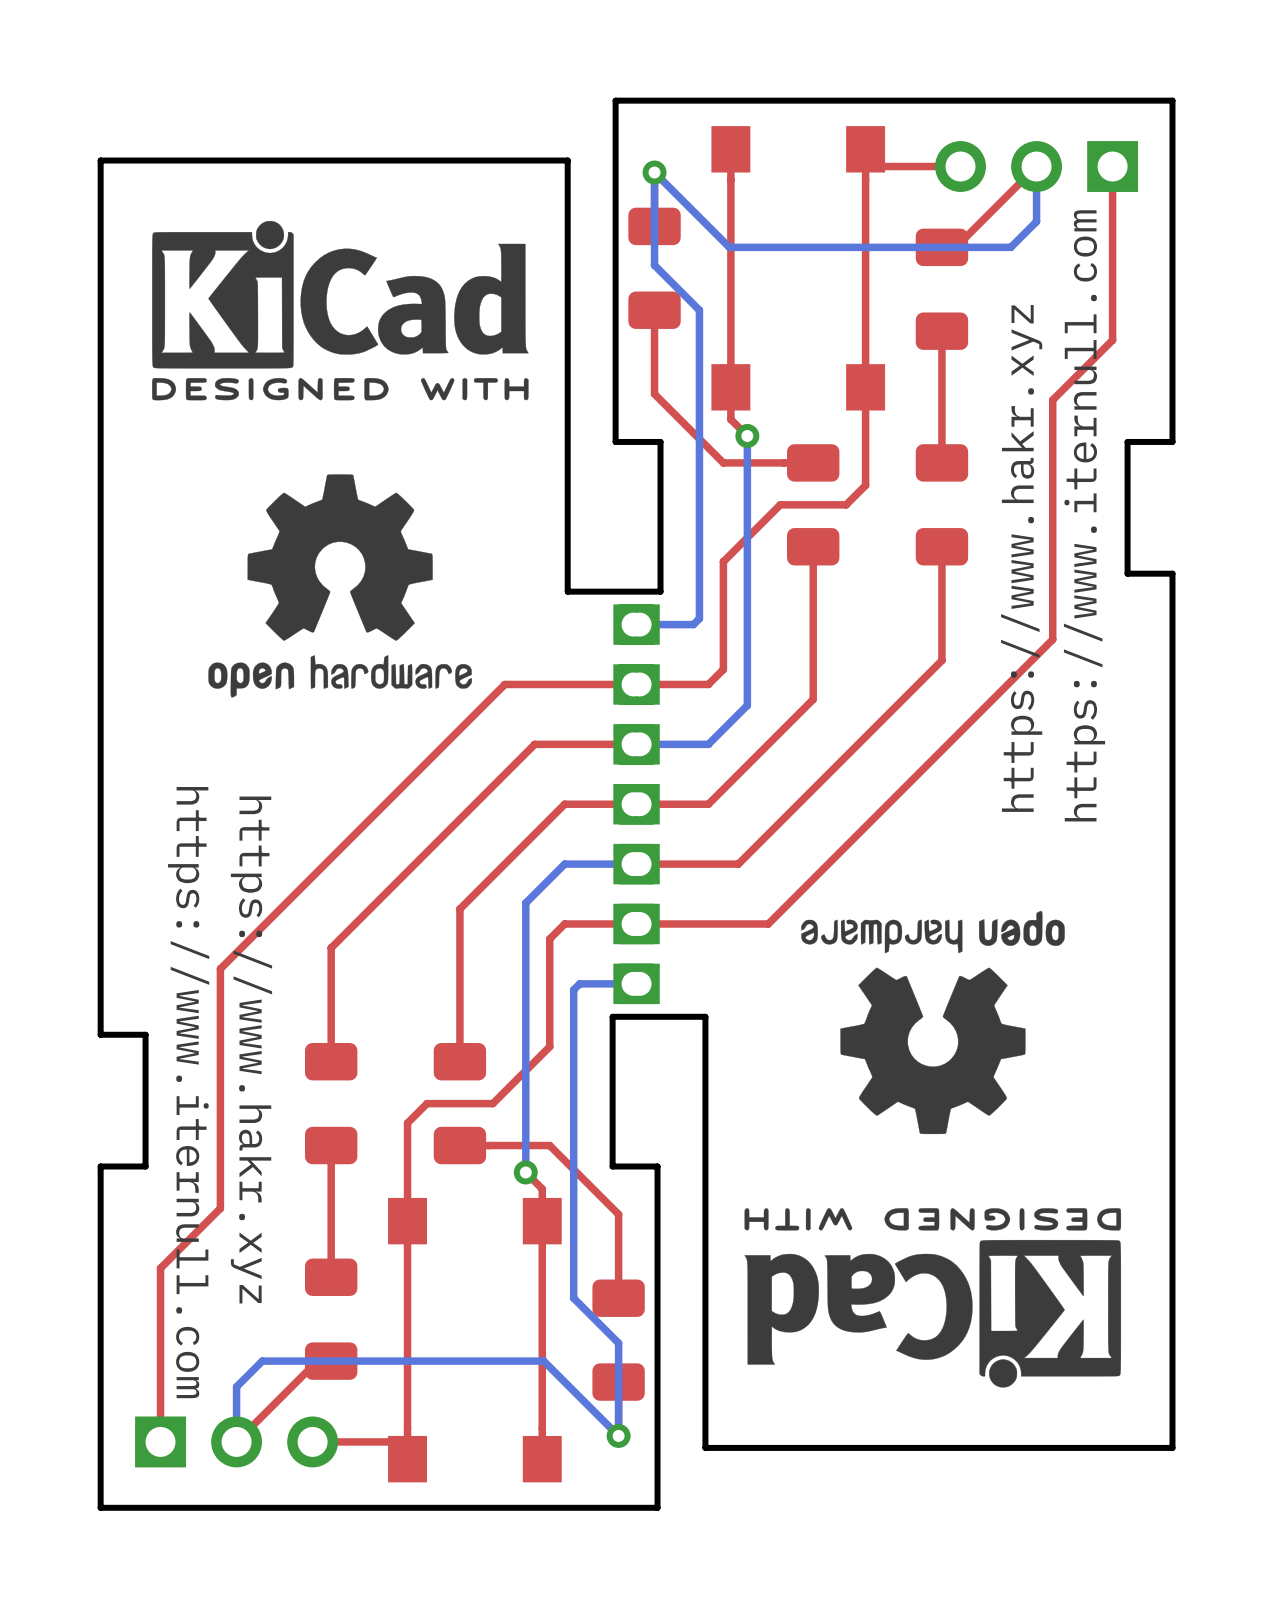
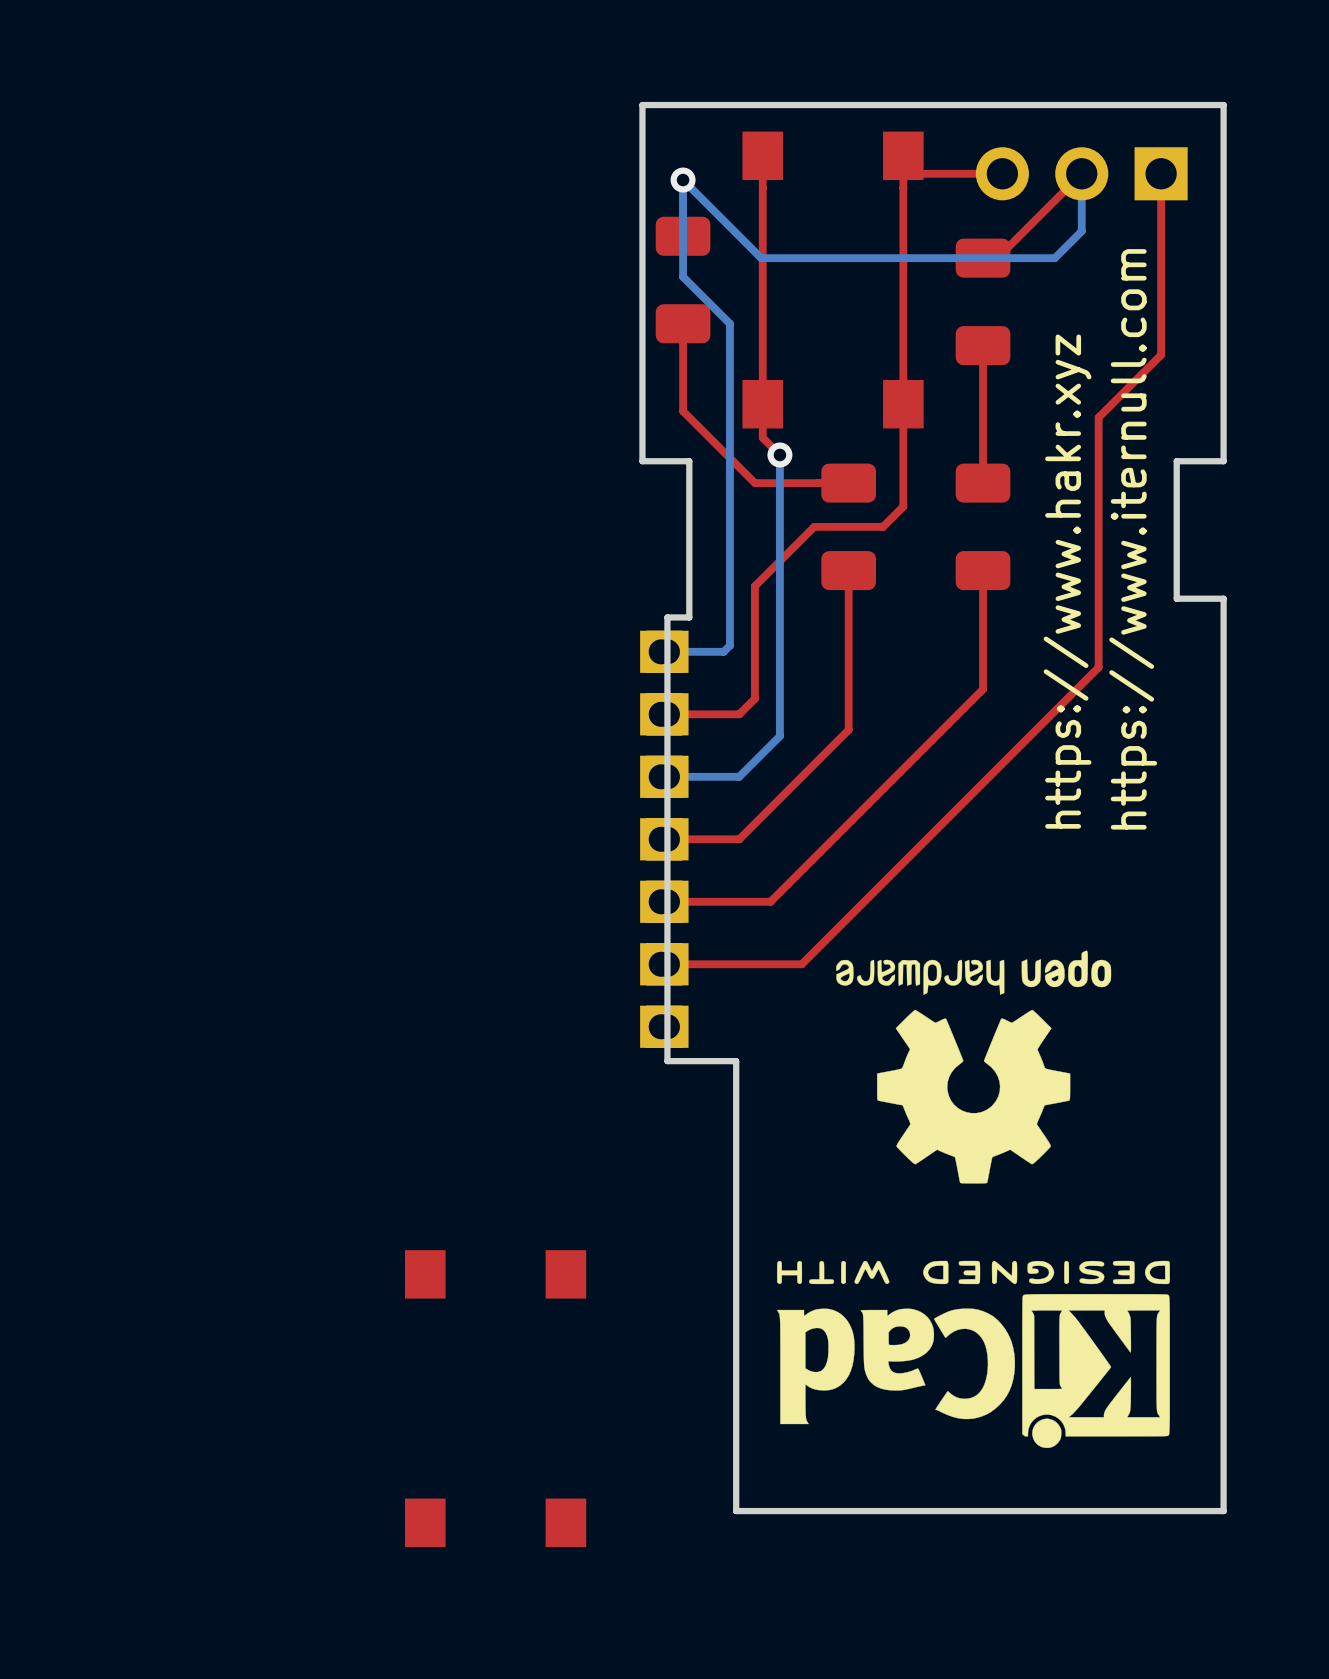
drawing: [152, 220, 529, 401] -> none
drawing: [208, 474, 472, 698] -> none
board edge: (639, 591) (567, 591) (567, 160) (100, 160) (100, 1034) (145, 1034) (145, 1166) (100, 1166) (100, 1507) (657, 1507) (657, 1166) (612, 1166) (612, 1016) (639, 1016) -> (667, 617) (667, 1061)
top track: (620, 684) (504, 684) (220, 968) (220, 1208) (160, 1268) (160, 1441) -> none
top track: (620, 744) (534, 744) (331, 947) (331, 1061) -> none
top track: (620, 804) (564, 804) (459, 909) (459, 1061) -> none
bottom track: (620, 864) (564, 864) (525, 903) (525, 1172) -> none
top track: (620, 923) (564, 923) (549, 938) (549, 1046) (492, 1103) (426, 1103) (407, 1123) (407, 1459) (390, 1441) (312, 1441) -> none
bottom track: (620, 983) (579, 983) (573, 989) (573, 1298) (618, 1343) (618, 1435) (543, 1361) (262, 1361) (236, 1386) (236, 1441) -> none
text: https://www.hakr.xyz (251, 1050) -> none
text: https://www.iternull.com (188, 1092) -> none
part: (331, 1103) -> none
part: (459, 1103) -> none
top track: (331, 1145) (331, 1277) -> none
top track: (459, 1145) (549, 1145) (618, 1214) (618, 1298) -> none
top track: (525, 1172) (542, 1188) (542, 1459) -> none
via: (525, 1172) -> none
part: (331, 1319) -> none
part: (618, 1340) -> none
top track: (337, 1361) (317, 1361) (236, 1441) -> none
via: (618, 1435) -> none
part: (236, 1441) -> none

